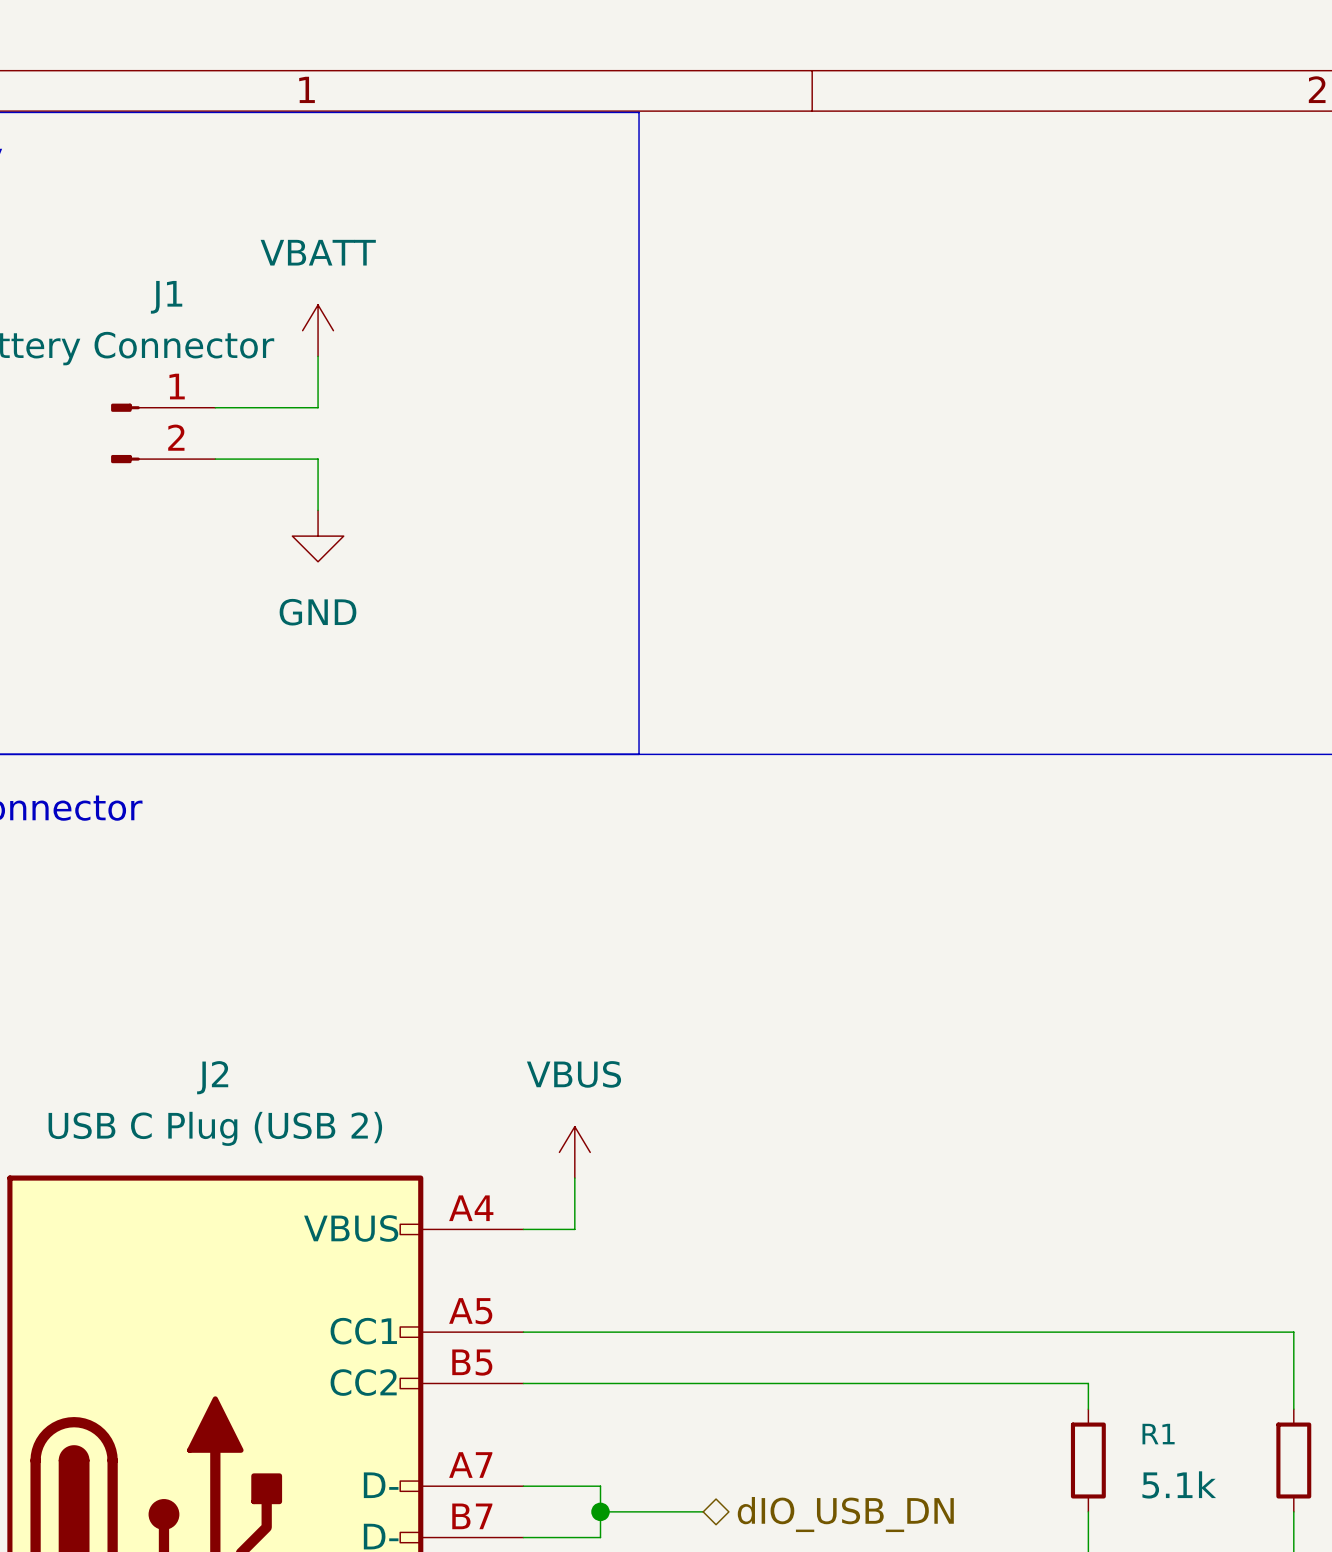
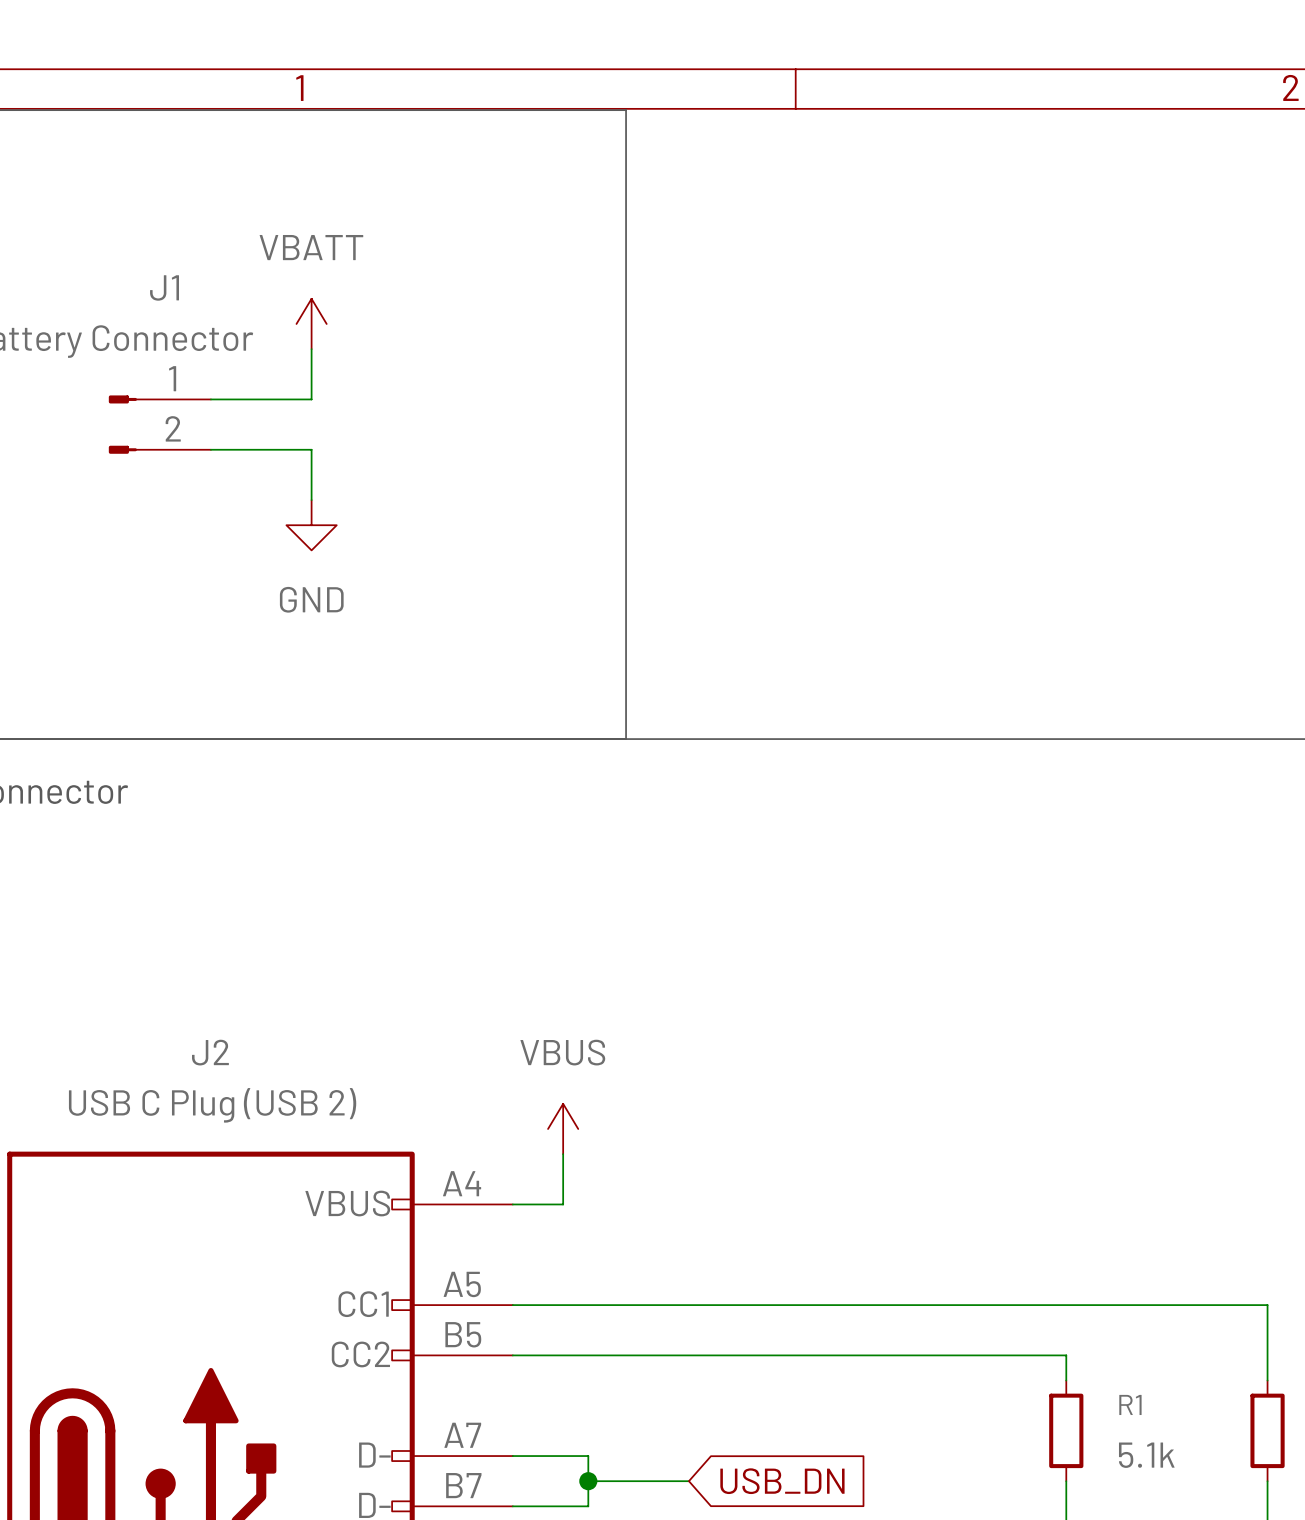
hierarchical label: dIO_USB_DN (845, 1514) -> none
global label: none -> USB_DN (782, 1481)

